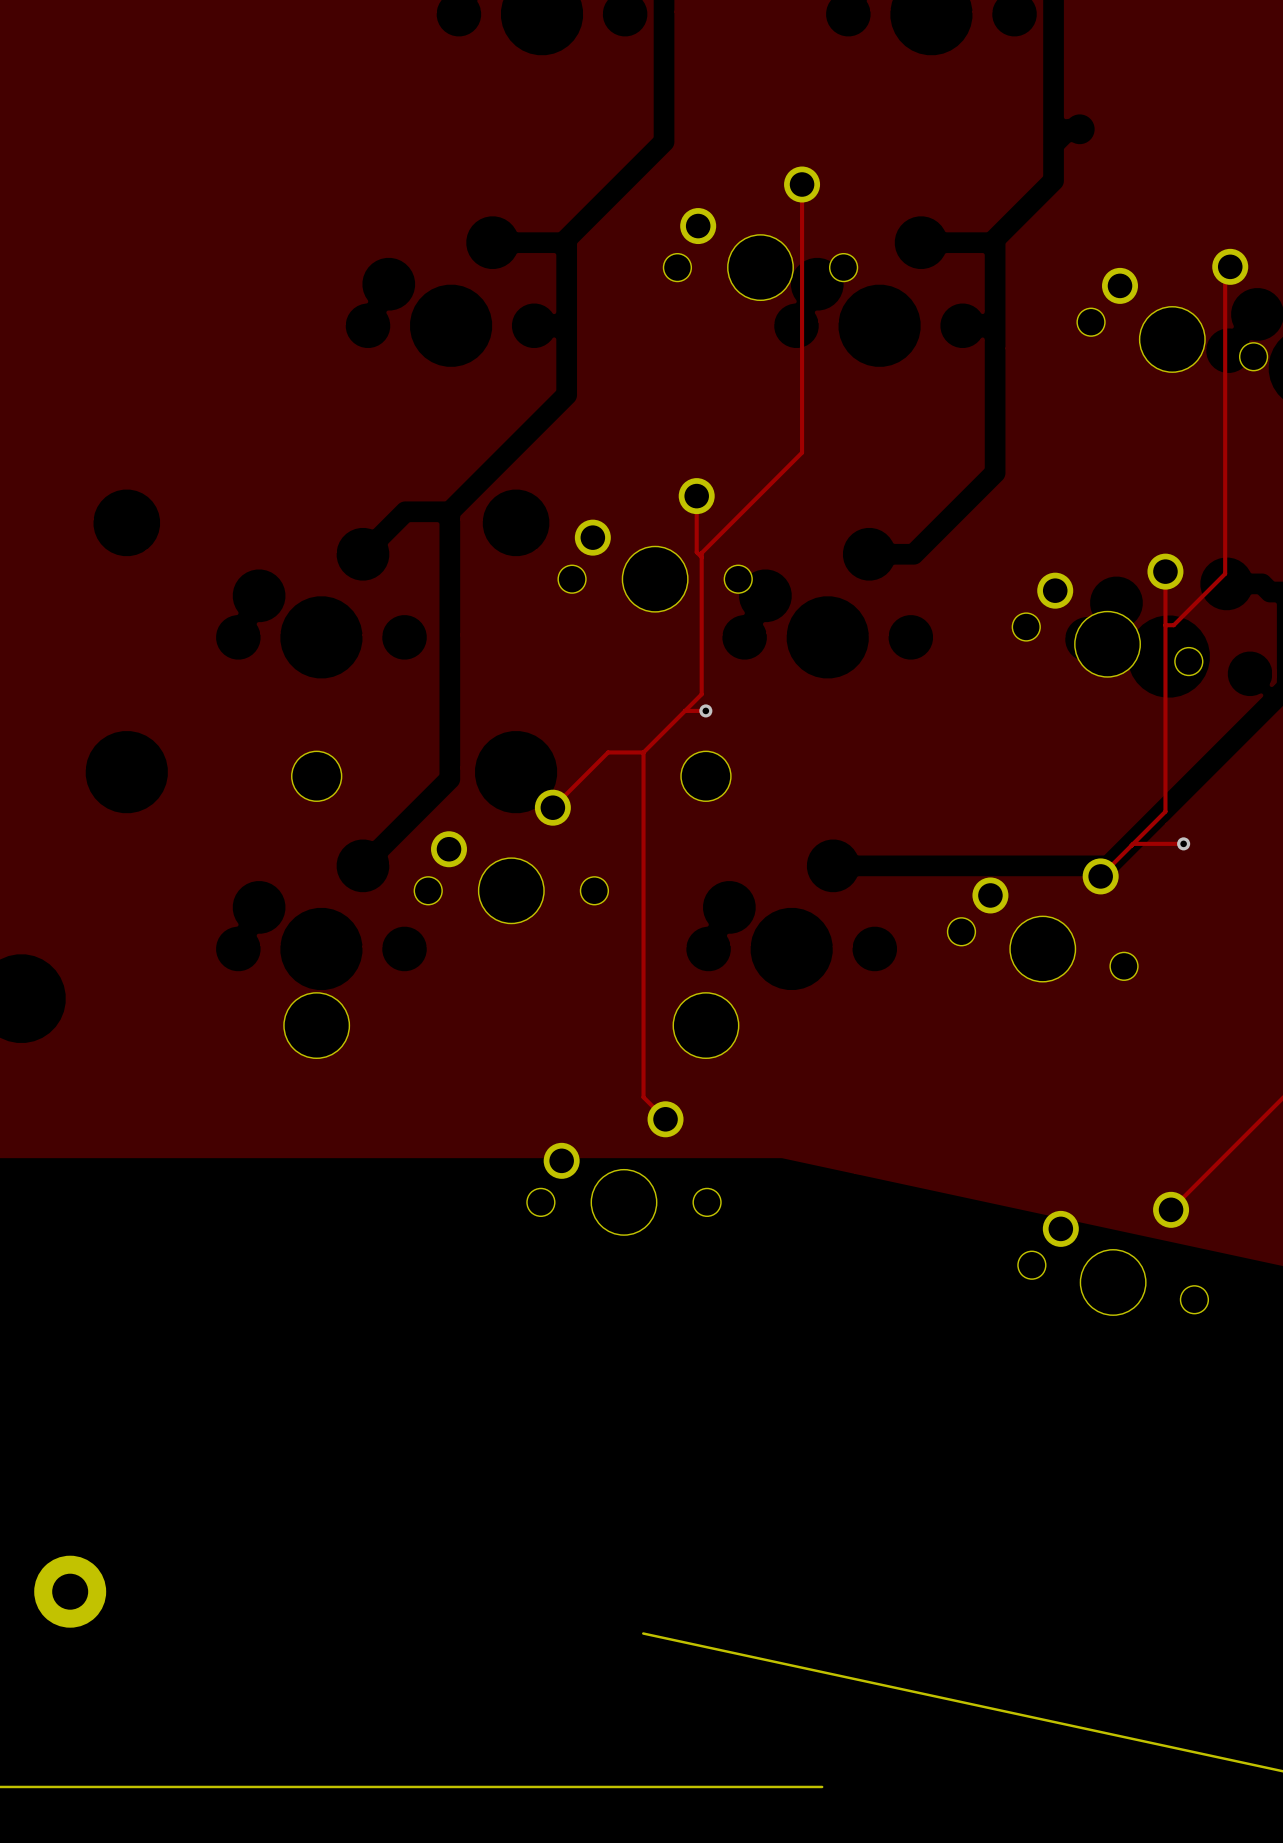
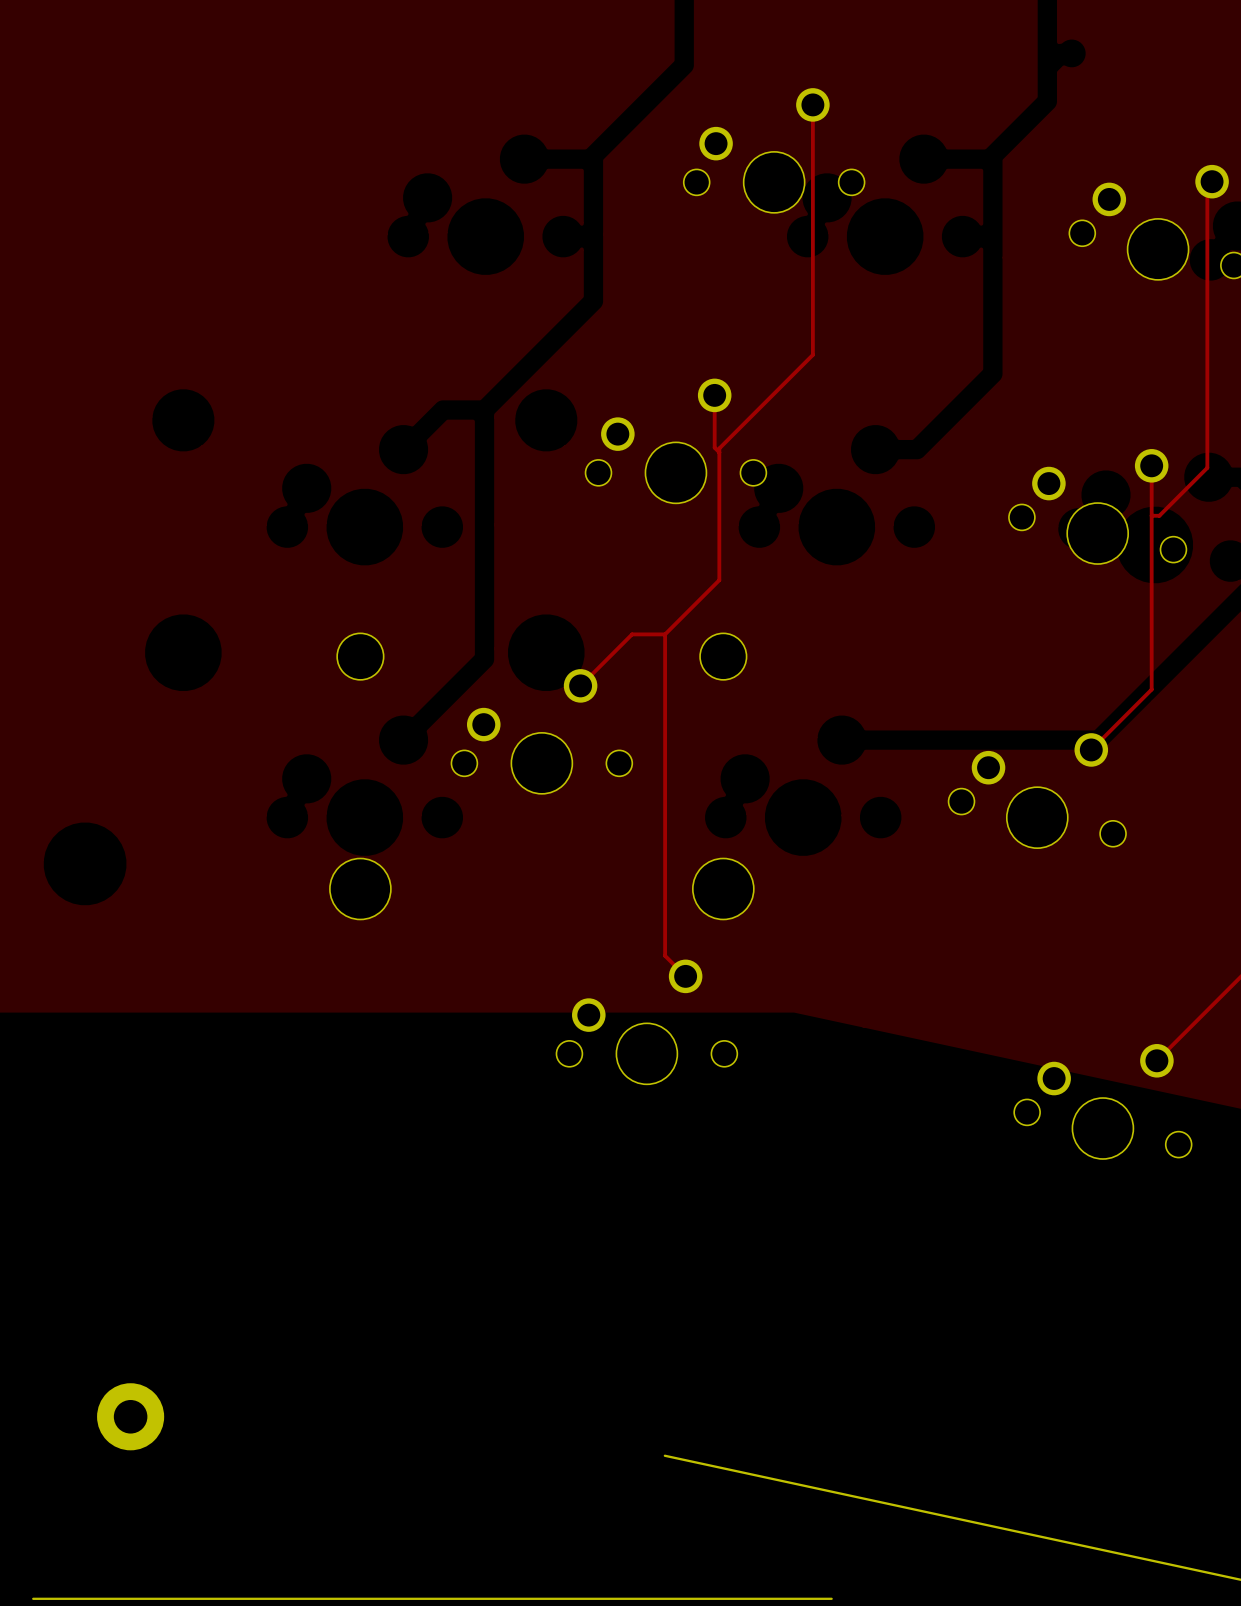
track: (685, 710) (705, 710) -> none
via: (705, 710) -> none
track: (1133, 843) (1183, 843) -> none
via: (1183, 843) -> none

